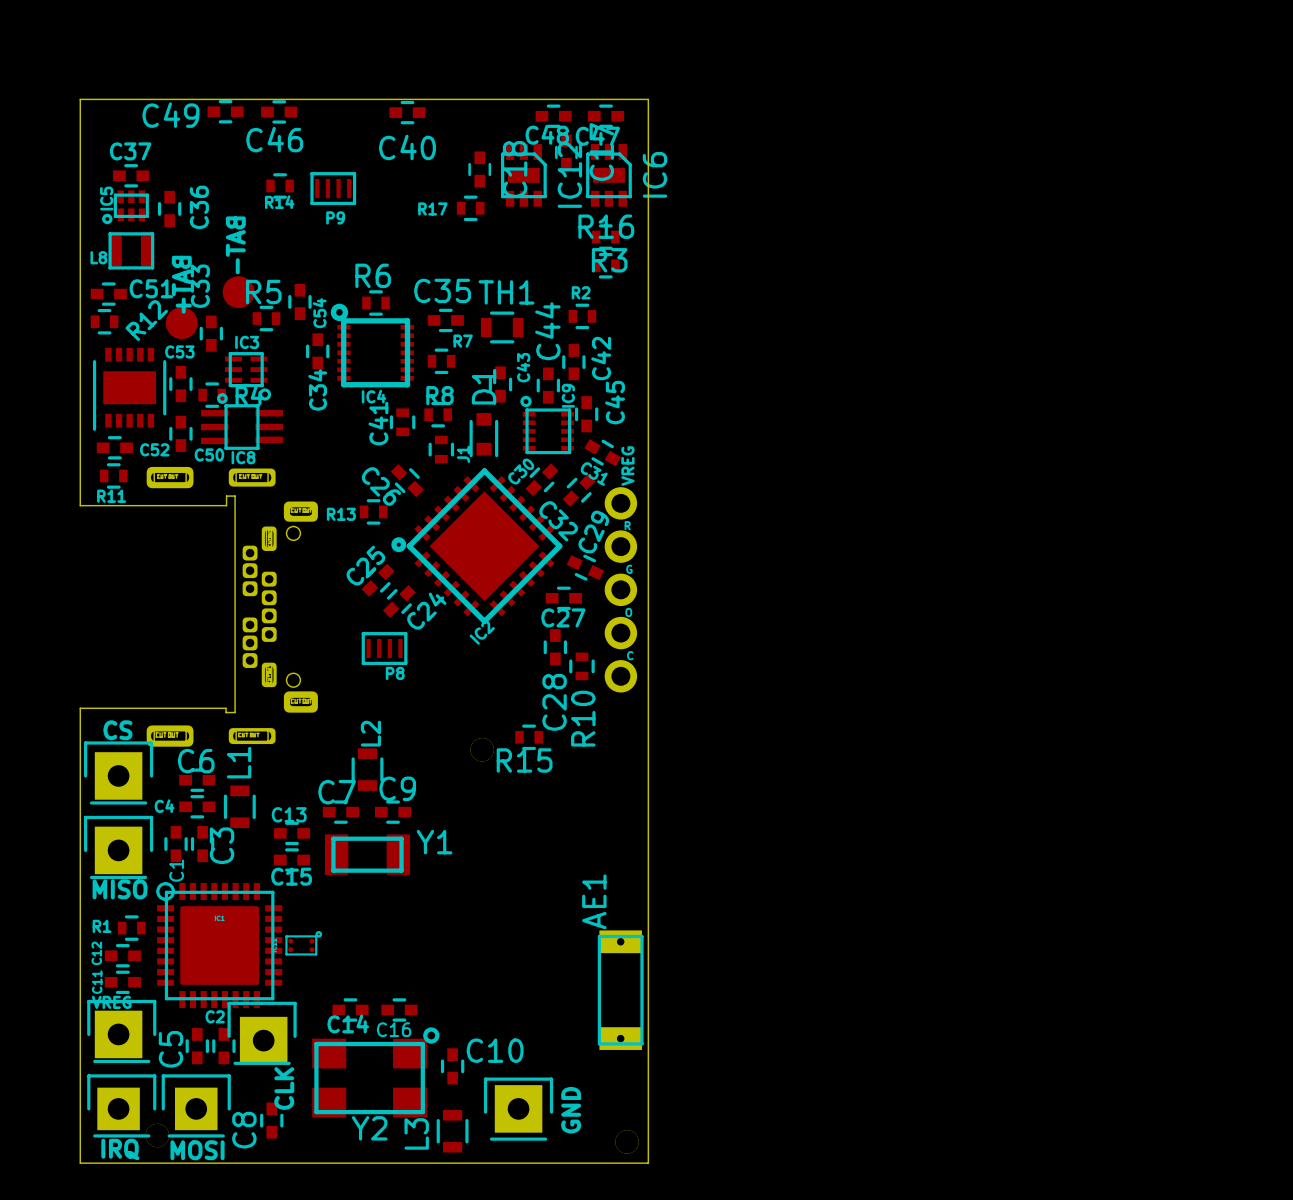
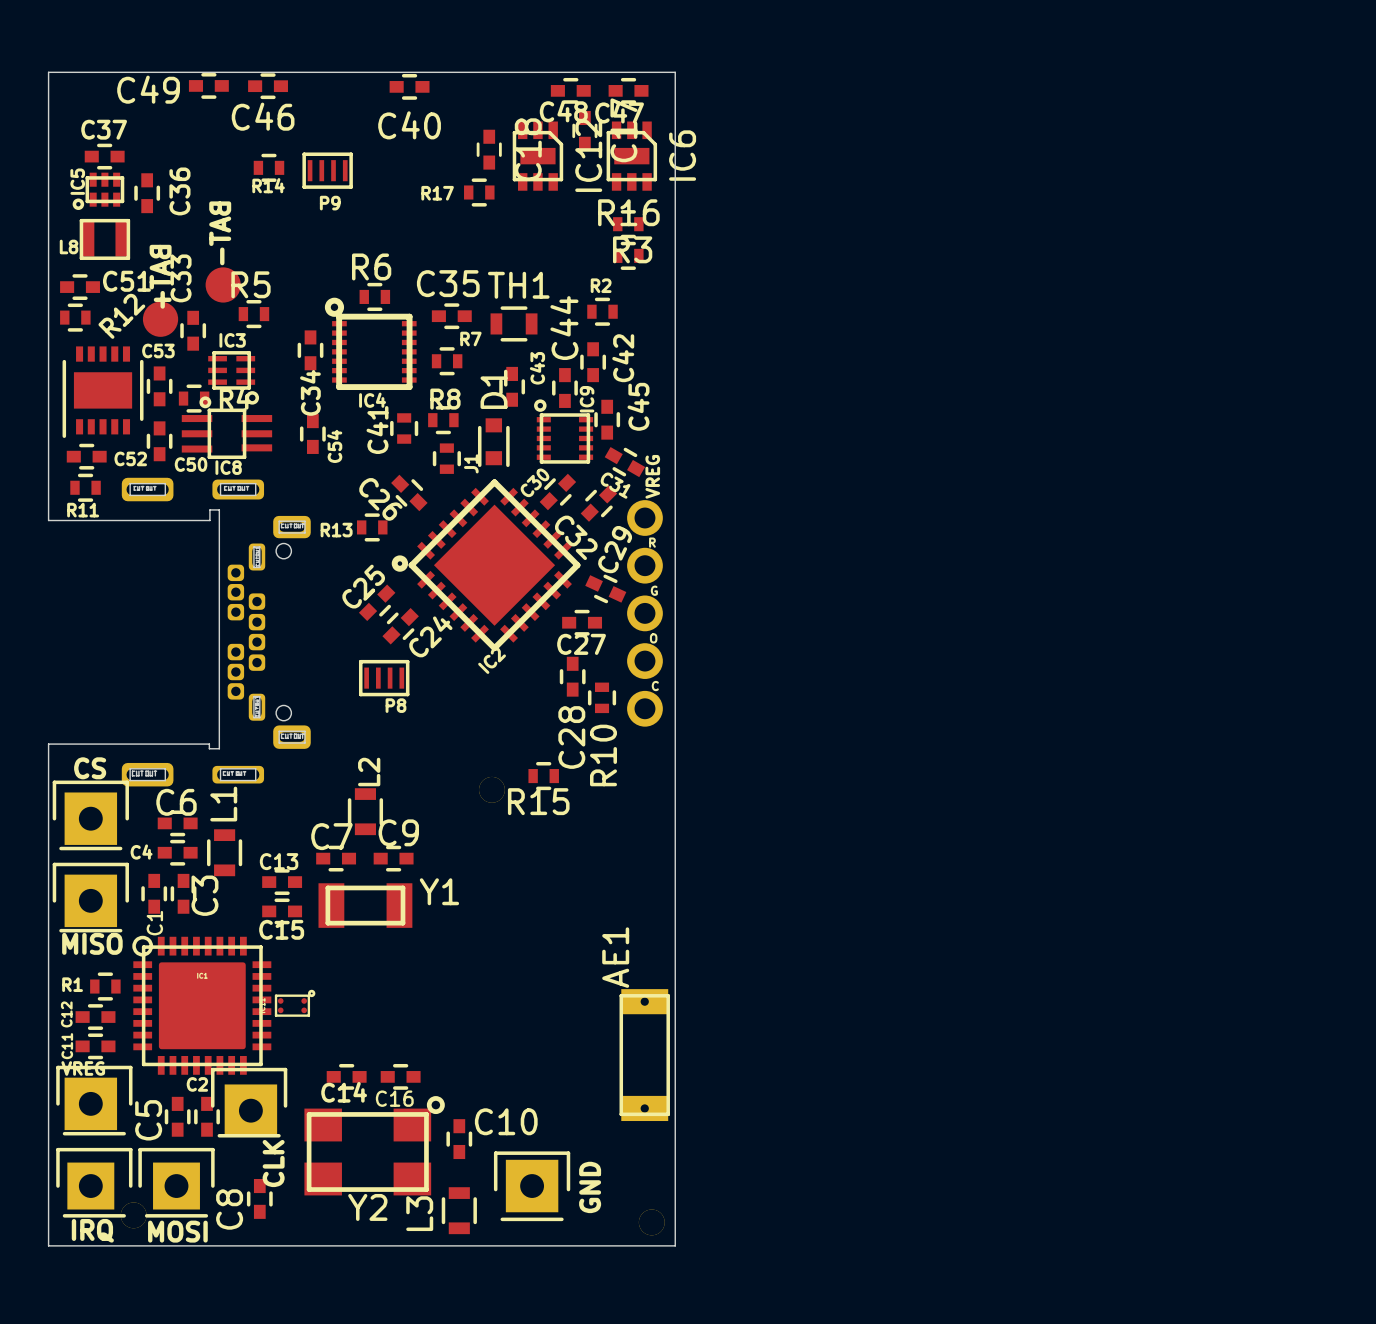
C54 position: (299, 301) -> (312, 434)

